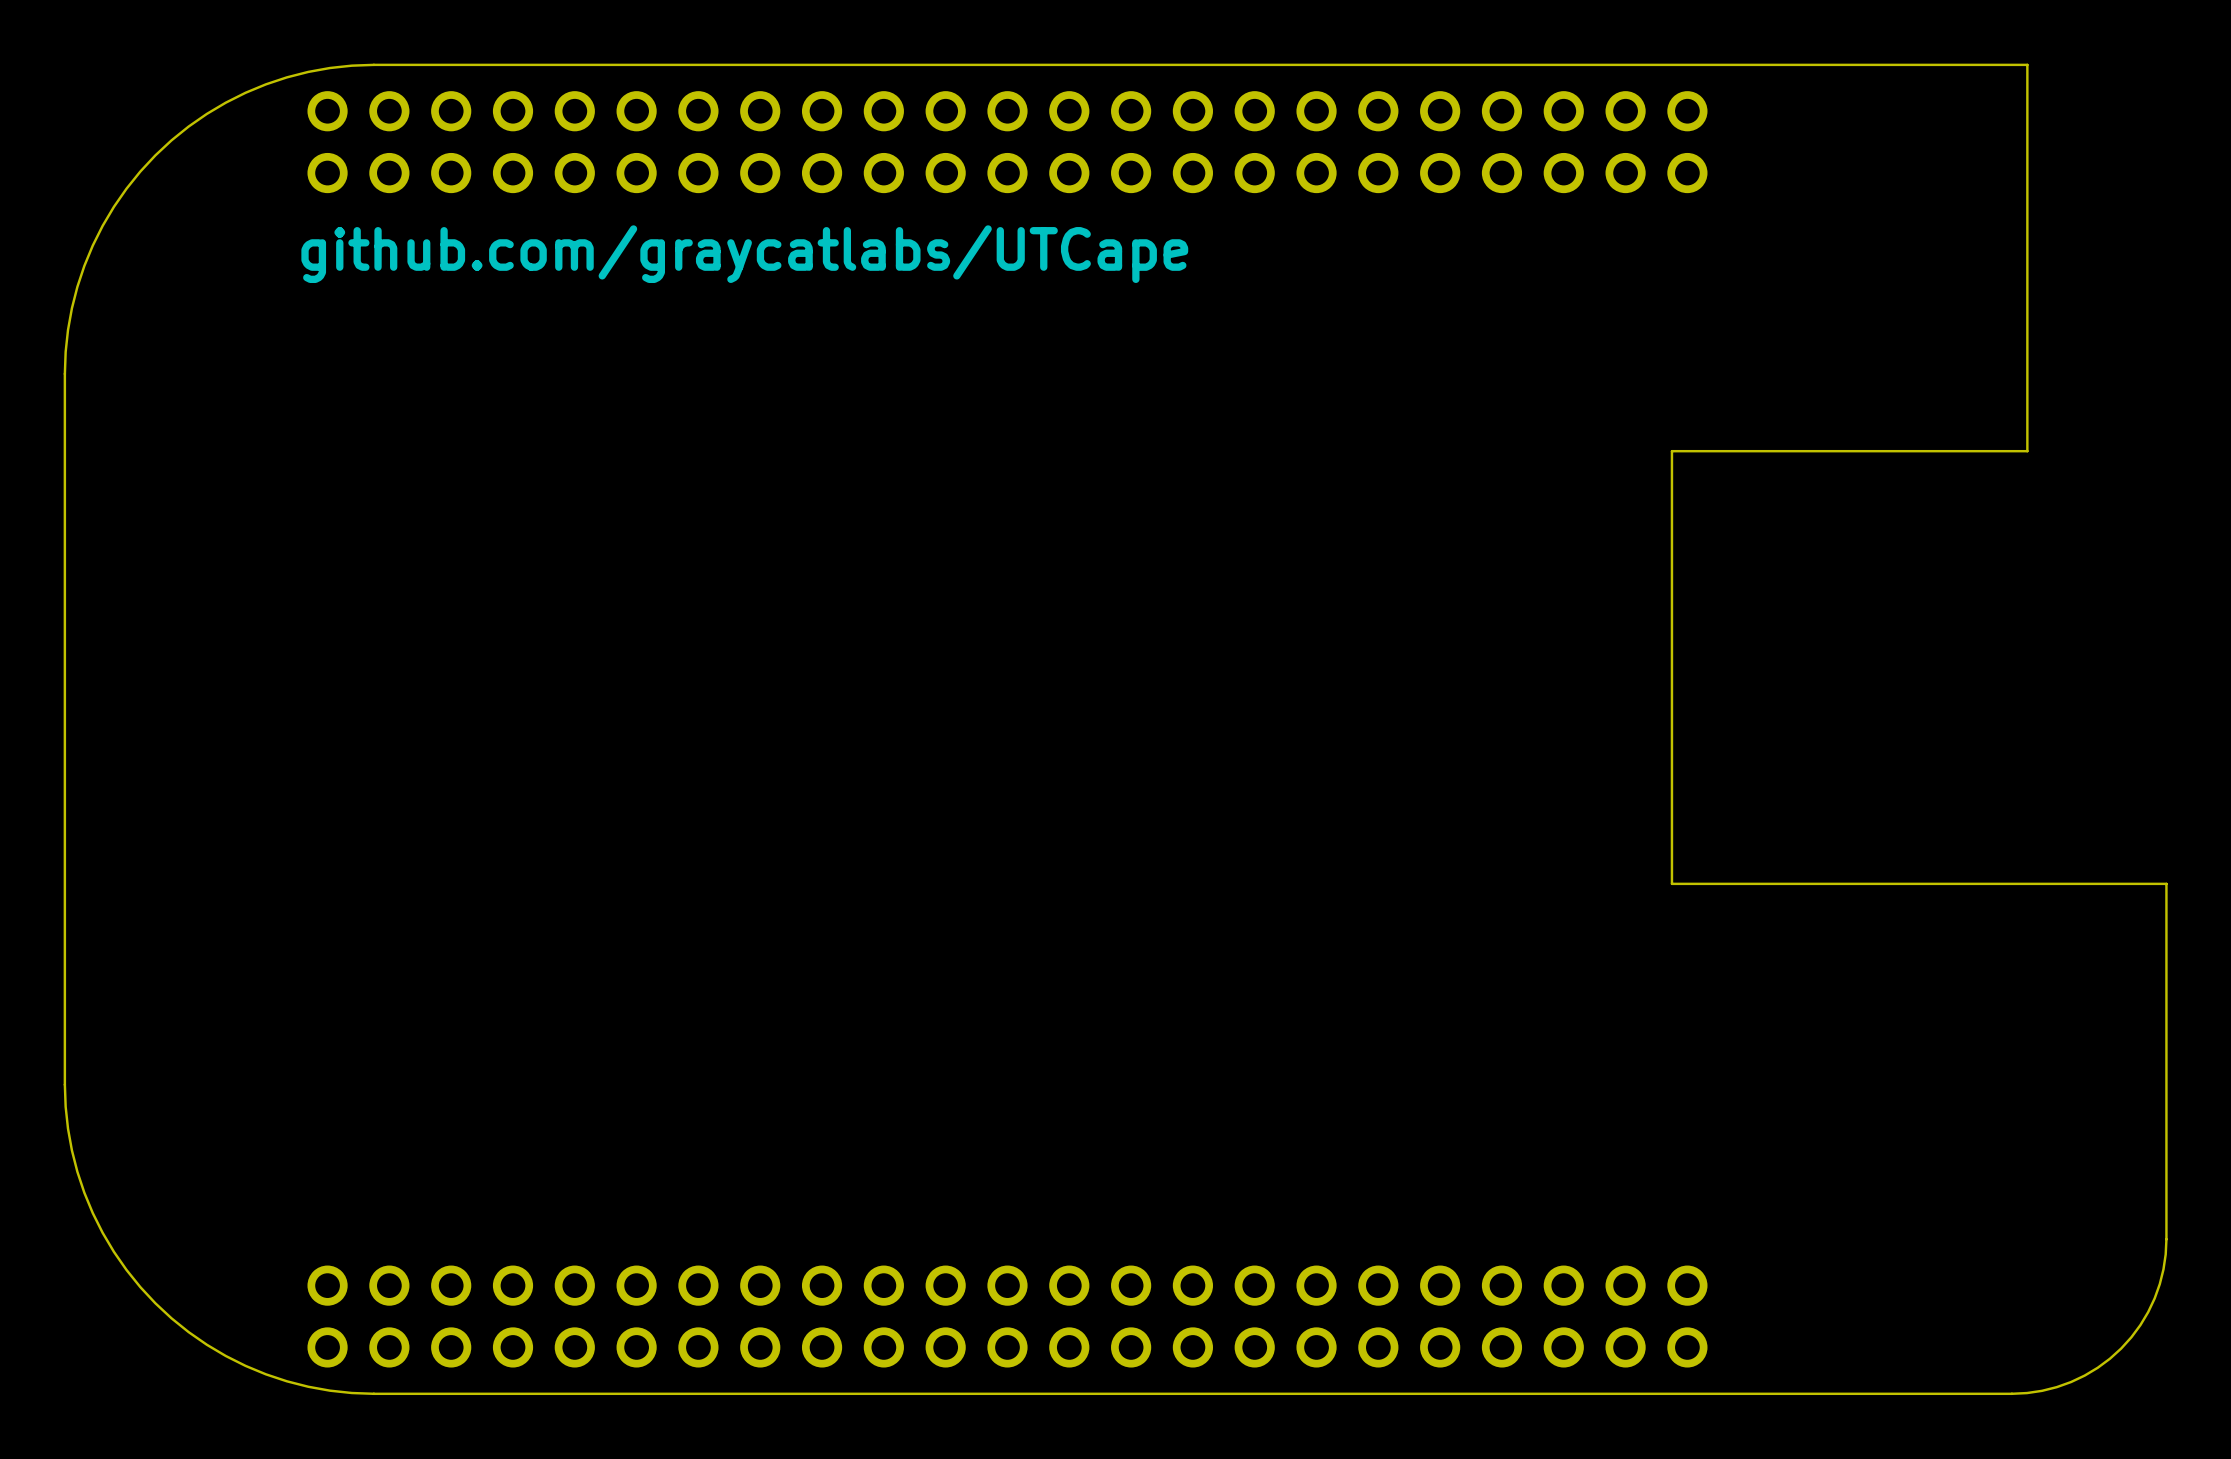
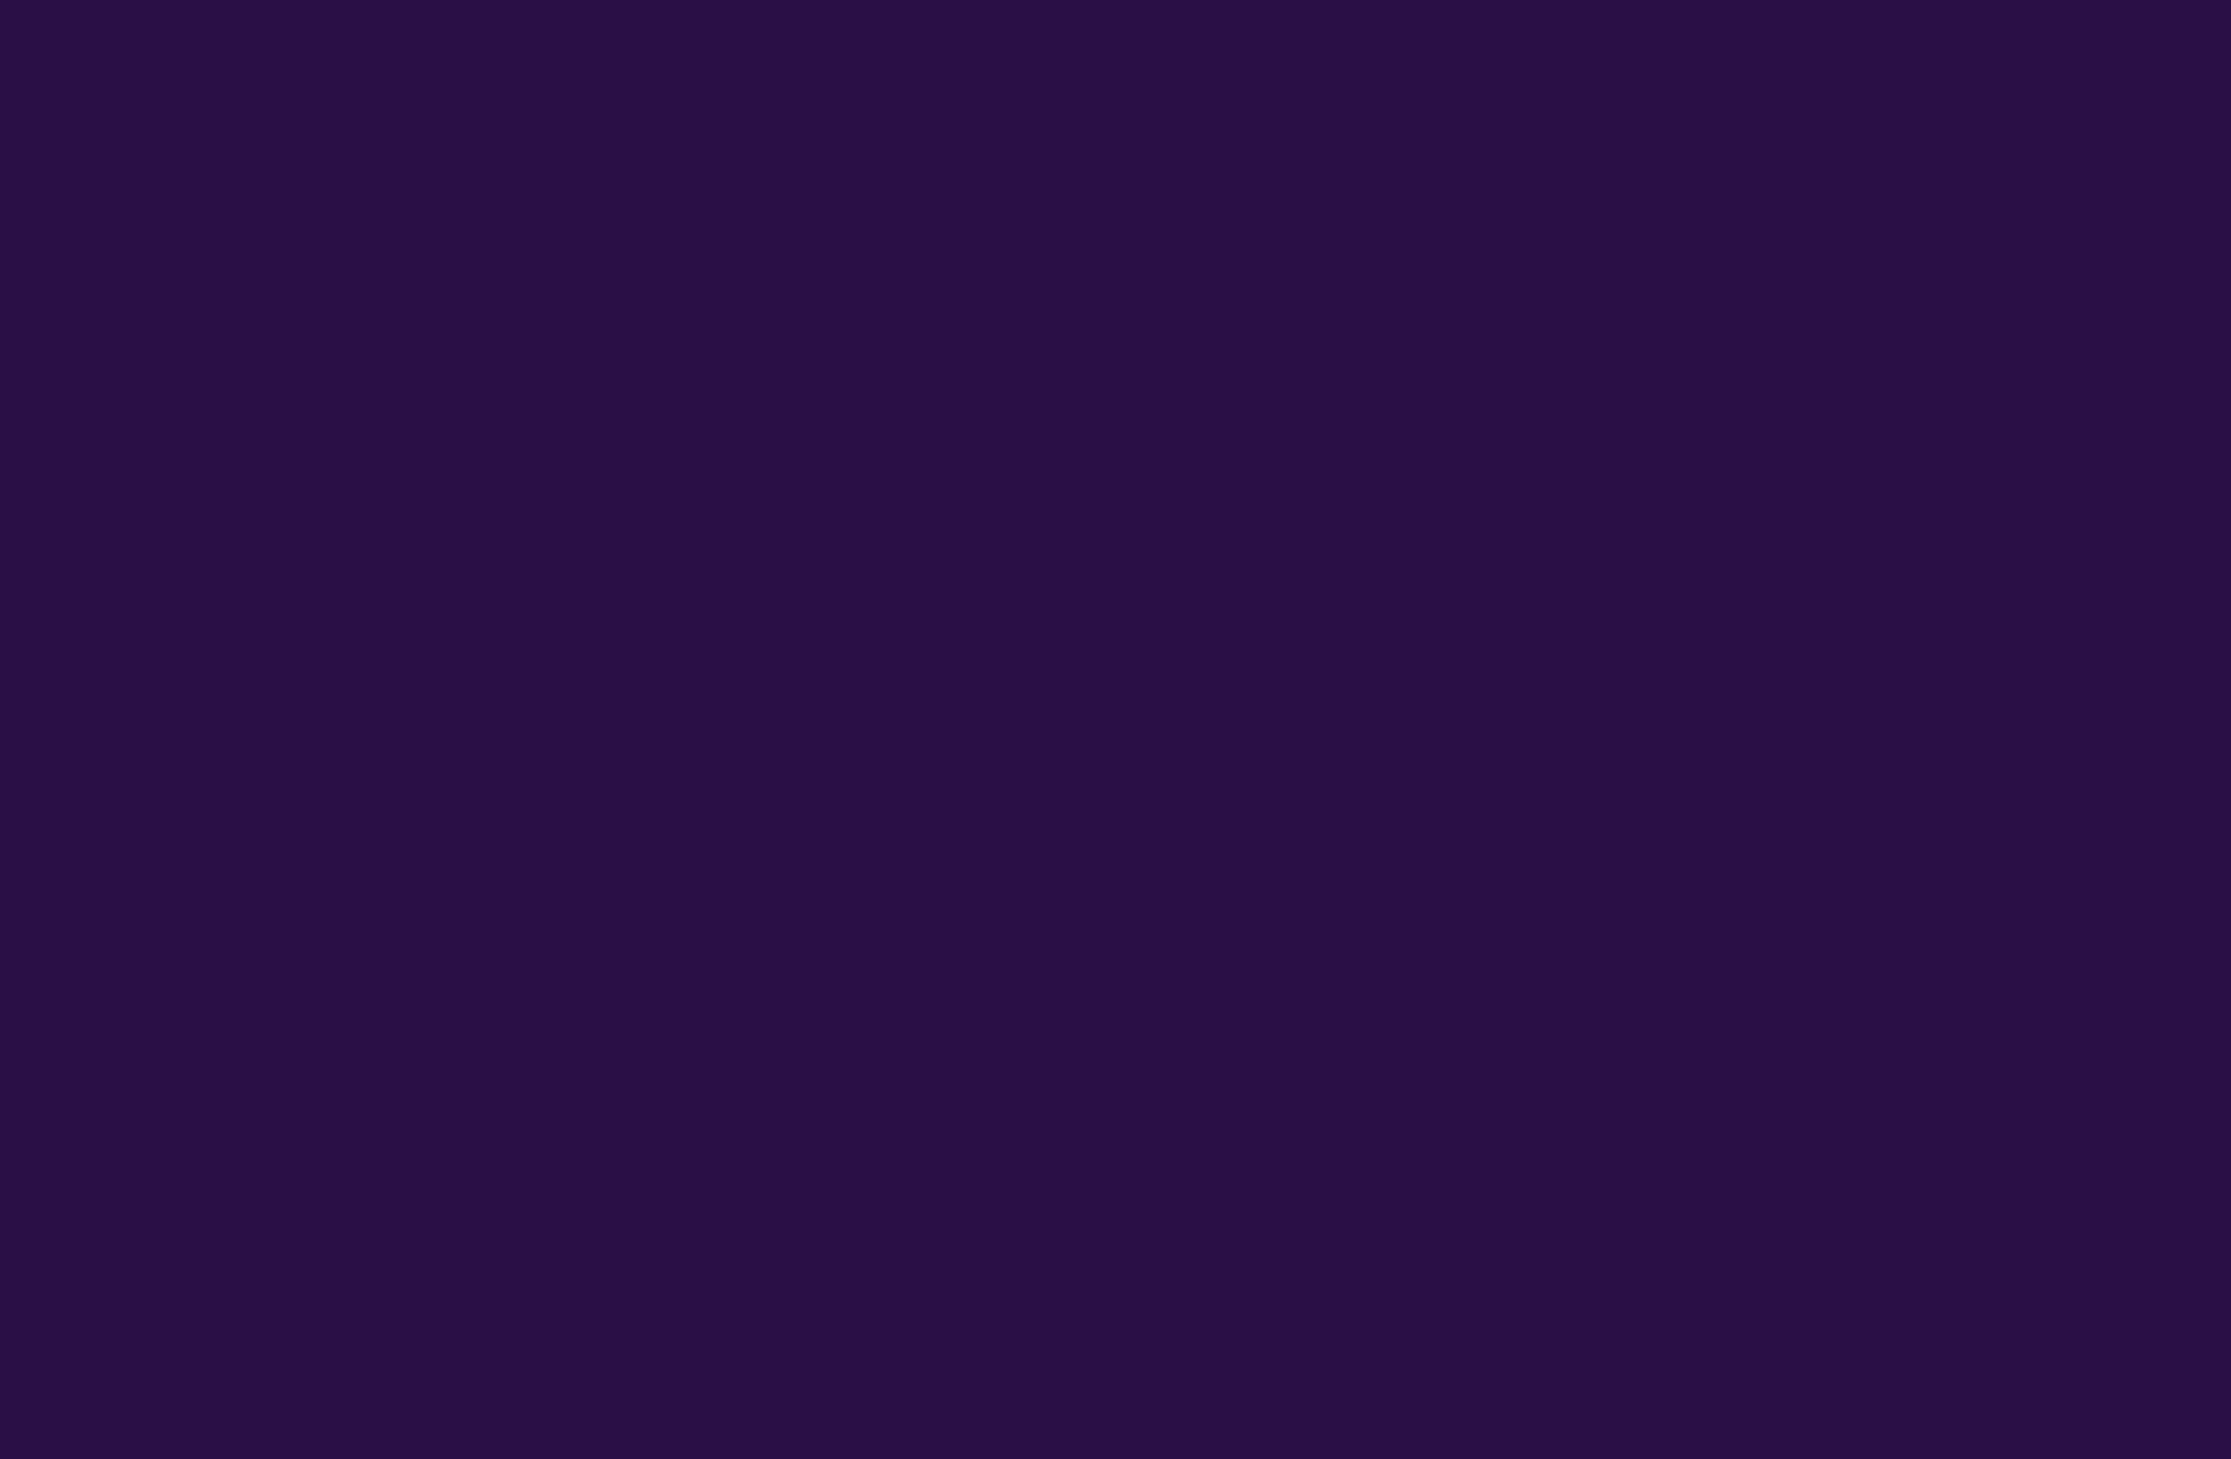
board edge: (2027, 64) (2027, 451) (1671, 451) (1671, 883) (2166, 883) (2165, 1254) (2159, 1284) (2140, 1325) (2121, 1348) (2097, 1367) (2056, 1387) (2011, 1393) (351, 1393) (308, 1386) (265, 1374) (245, 1365) (206, 1344) (171, 1318) (155, 1303) (140, 1287) (113, 1251) (92, 1213) (84, 1192) (71, 1150) (65, 1106) (65, 351) (71, 308) (77, 286) (84, 265) (102, 225) (126, 188) (155, 155) (171, 140) (206, 113) (245, 92) (286, 77) (329, 68) (373, 64) (2027, 64) -> none
part: (1007, 142) -> none
text: github.com/graycatlabs/UTCape (744, 254) -> none
part: (1007, 1316) -> none

